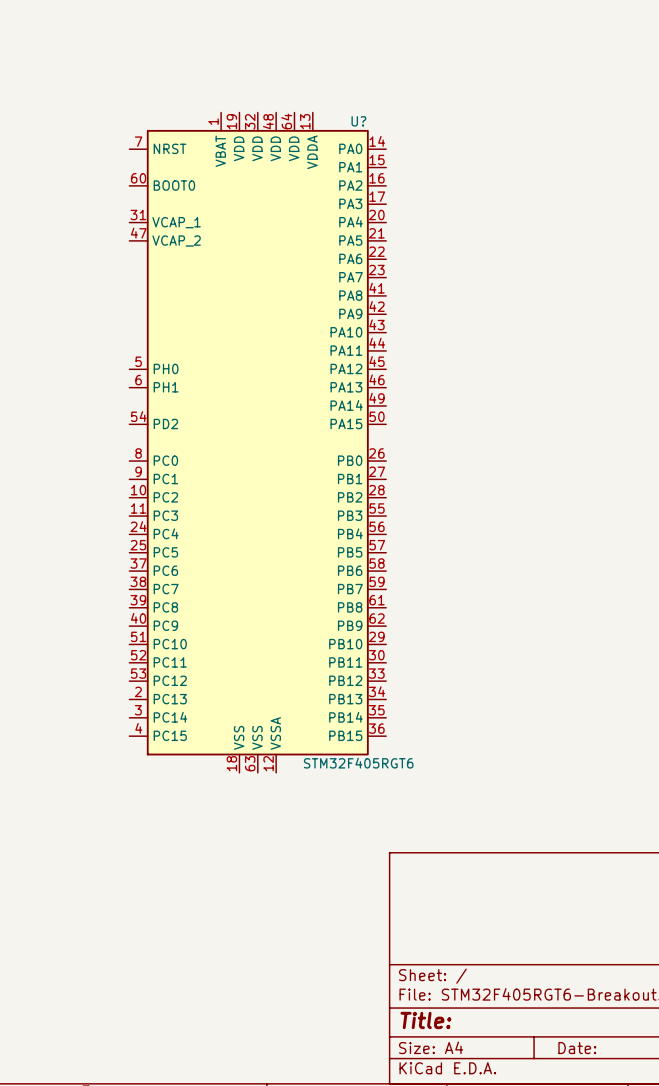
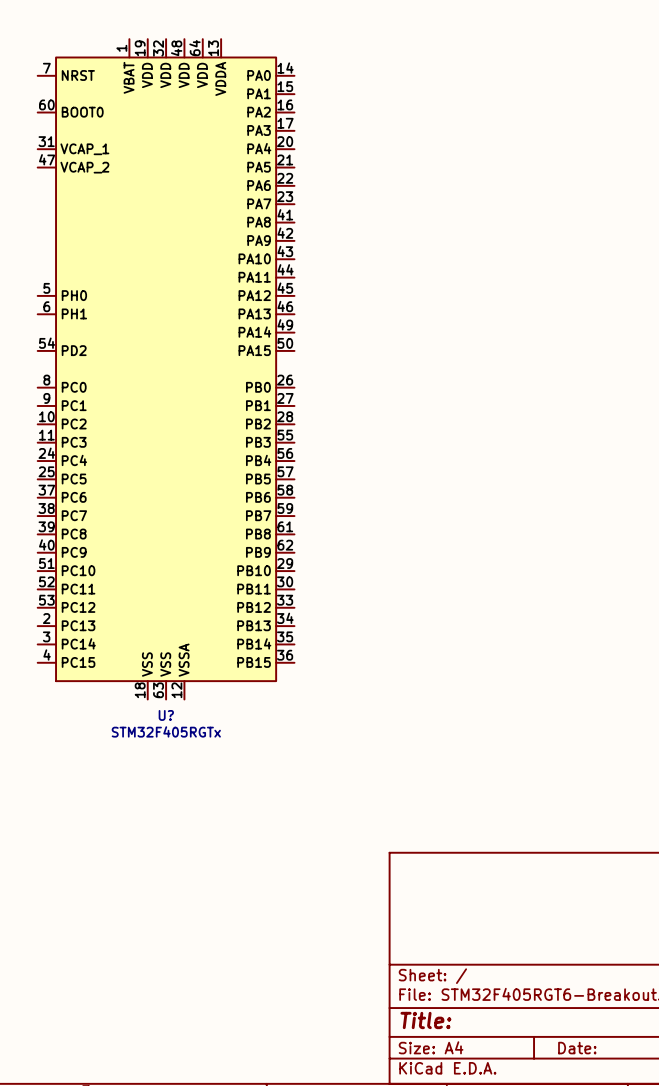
U?: none -> STM32F405RGTx (166, 369)
U?: STM32F405RGT6 (257, 442) -> none

